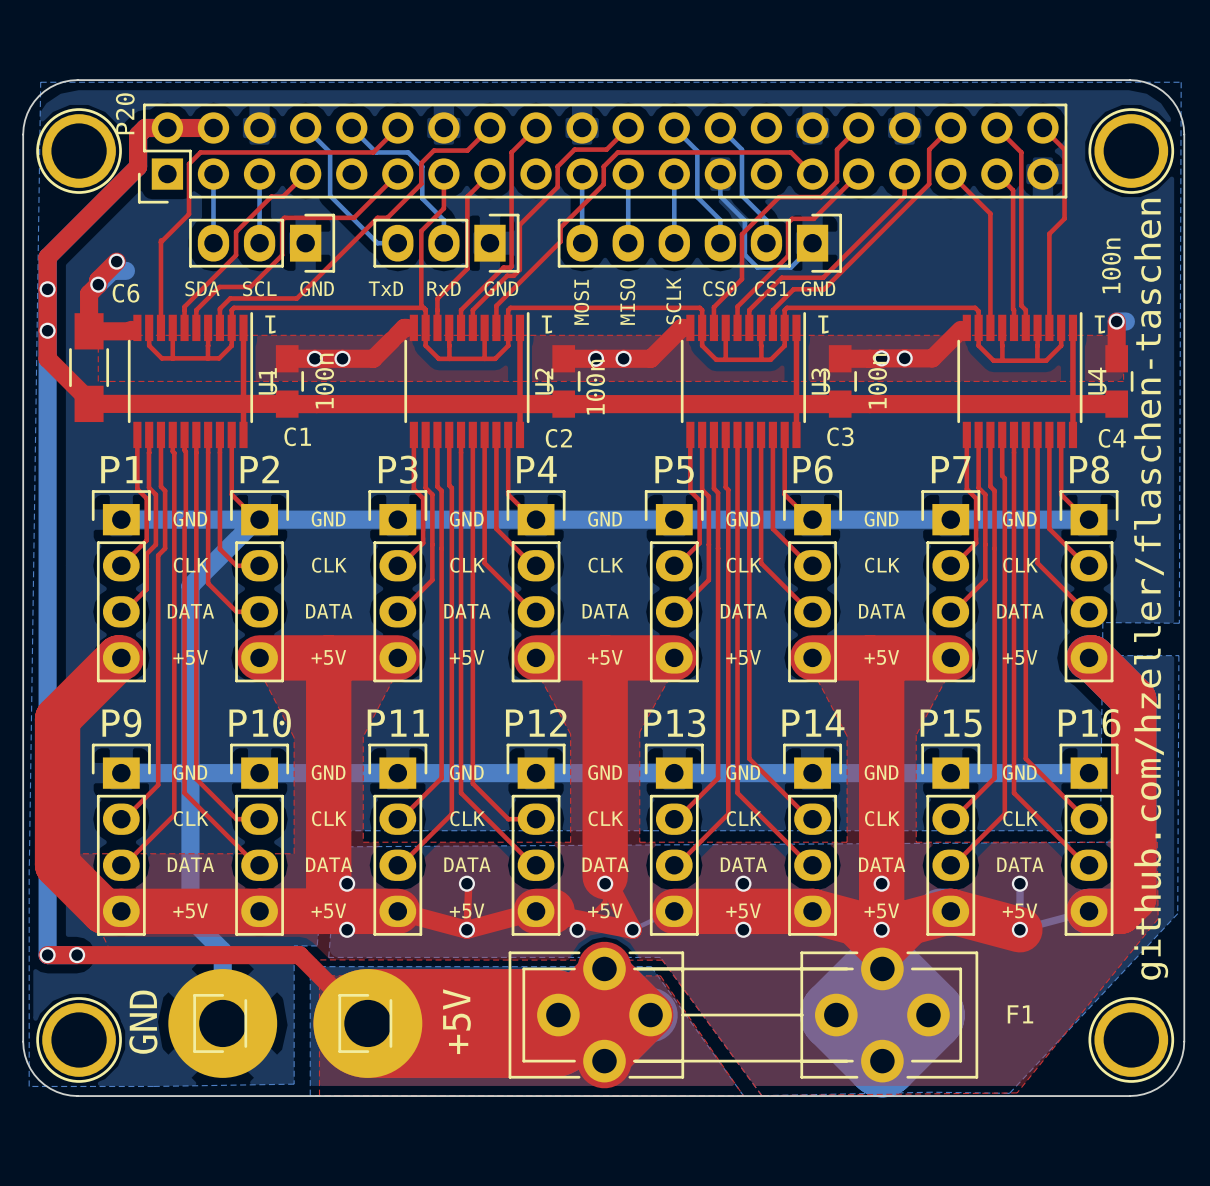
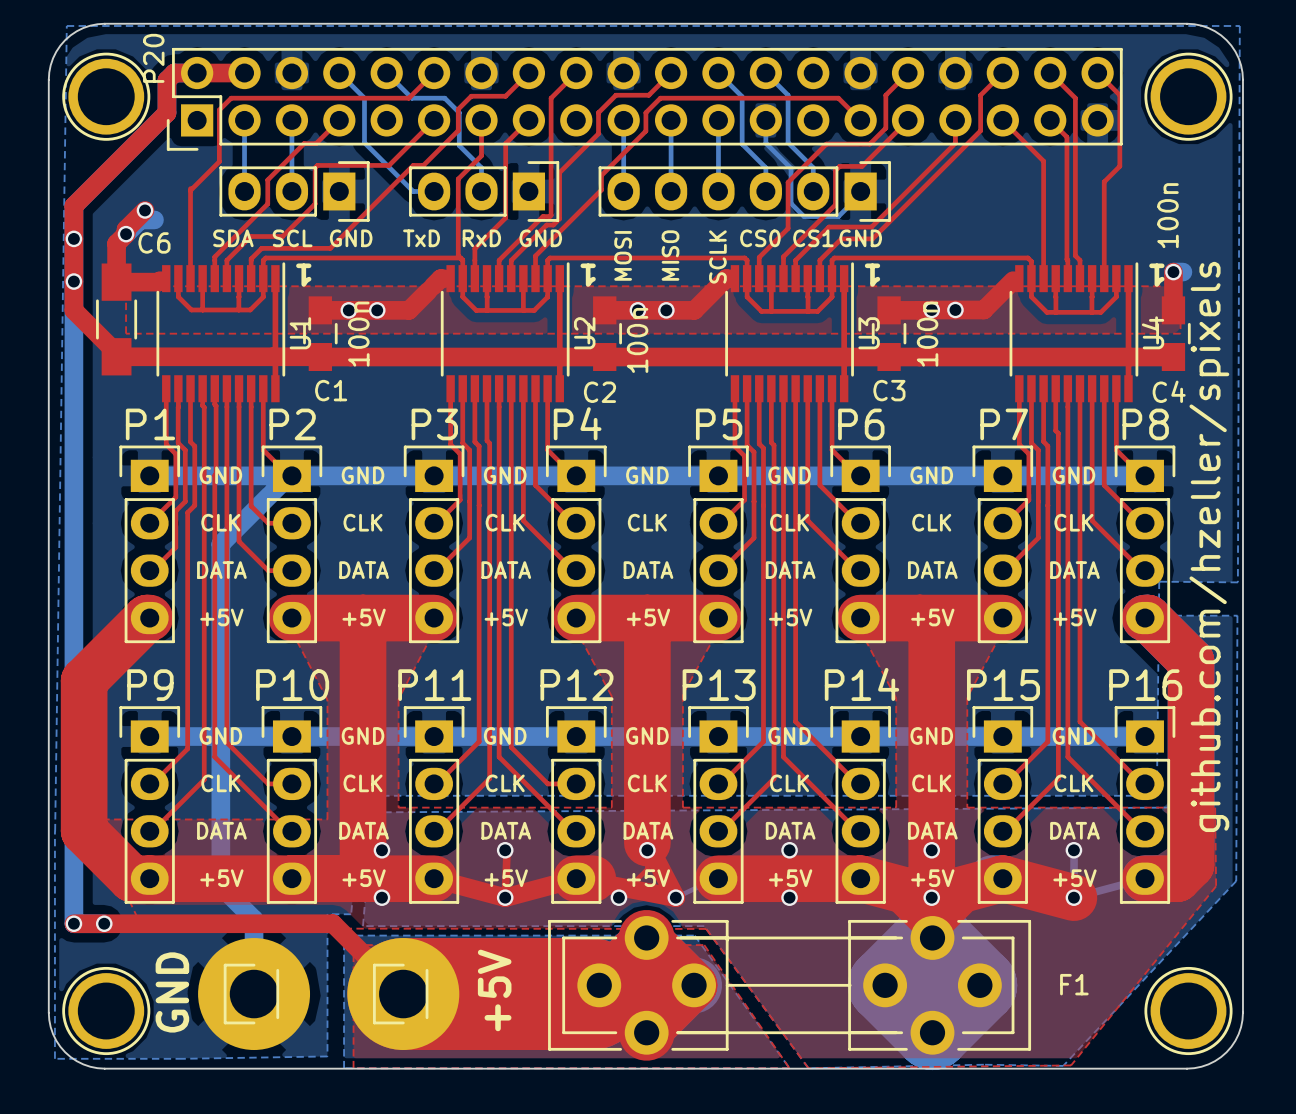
text: github.com/hzeller/flaschen-taschen (1151, 589) -> github.com/hzeller/spixels (1209, 546)

